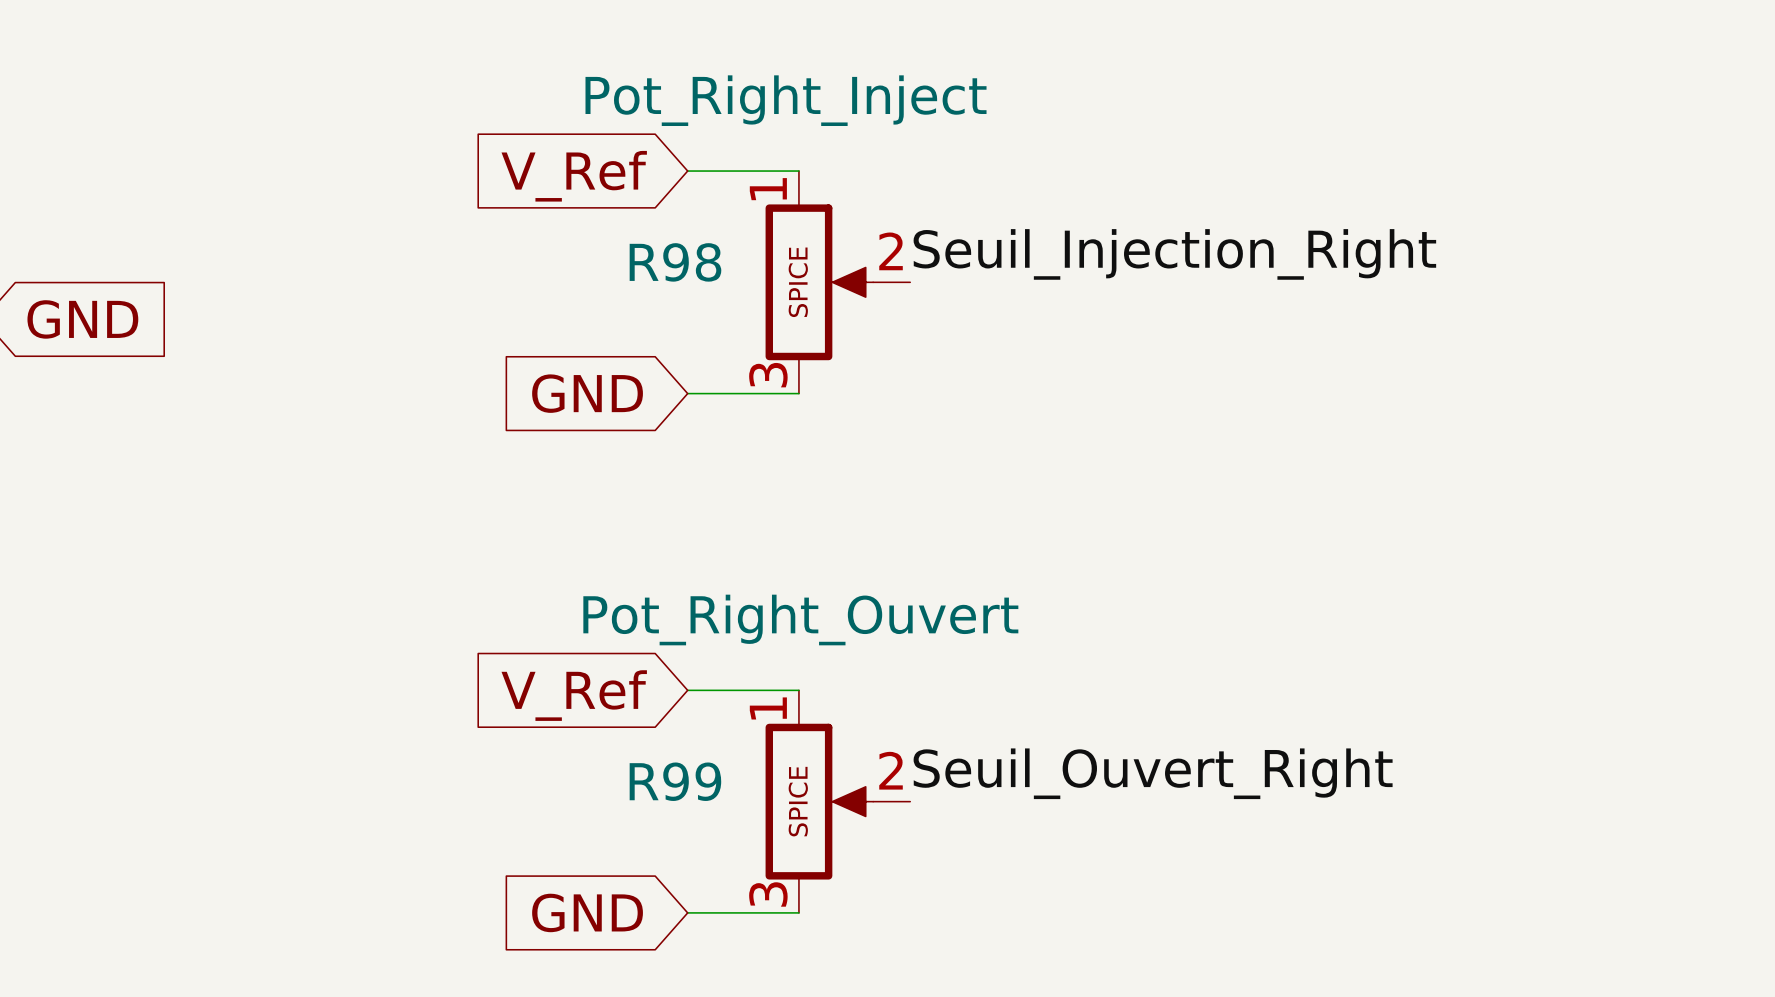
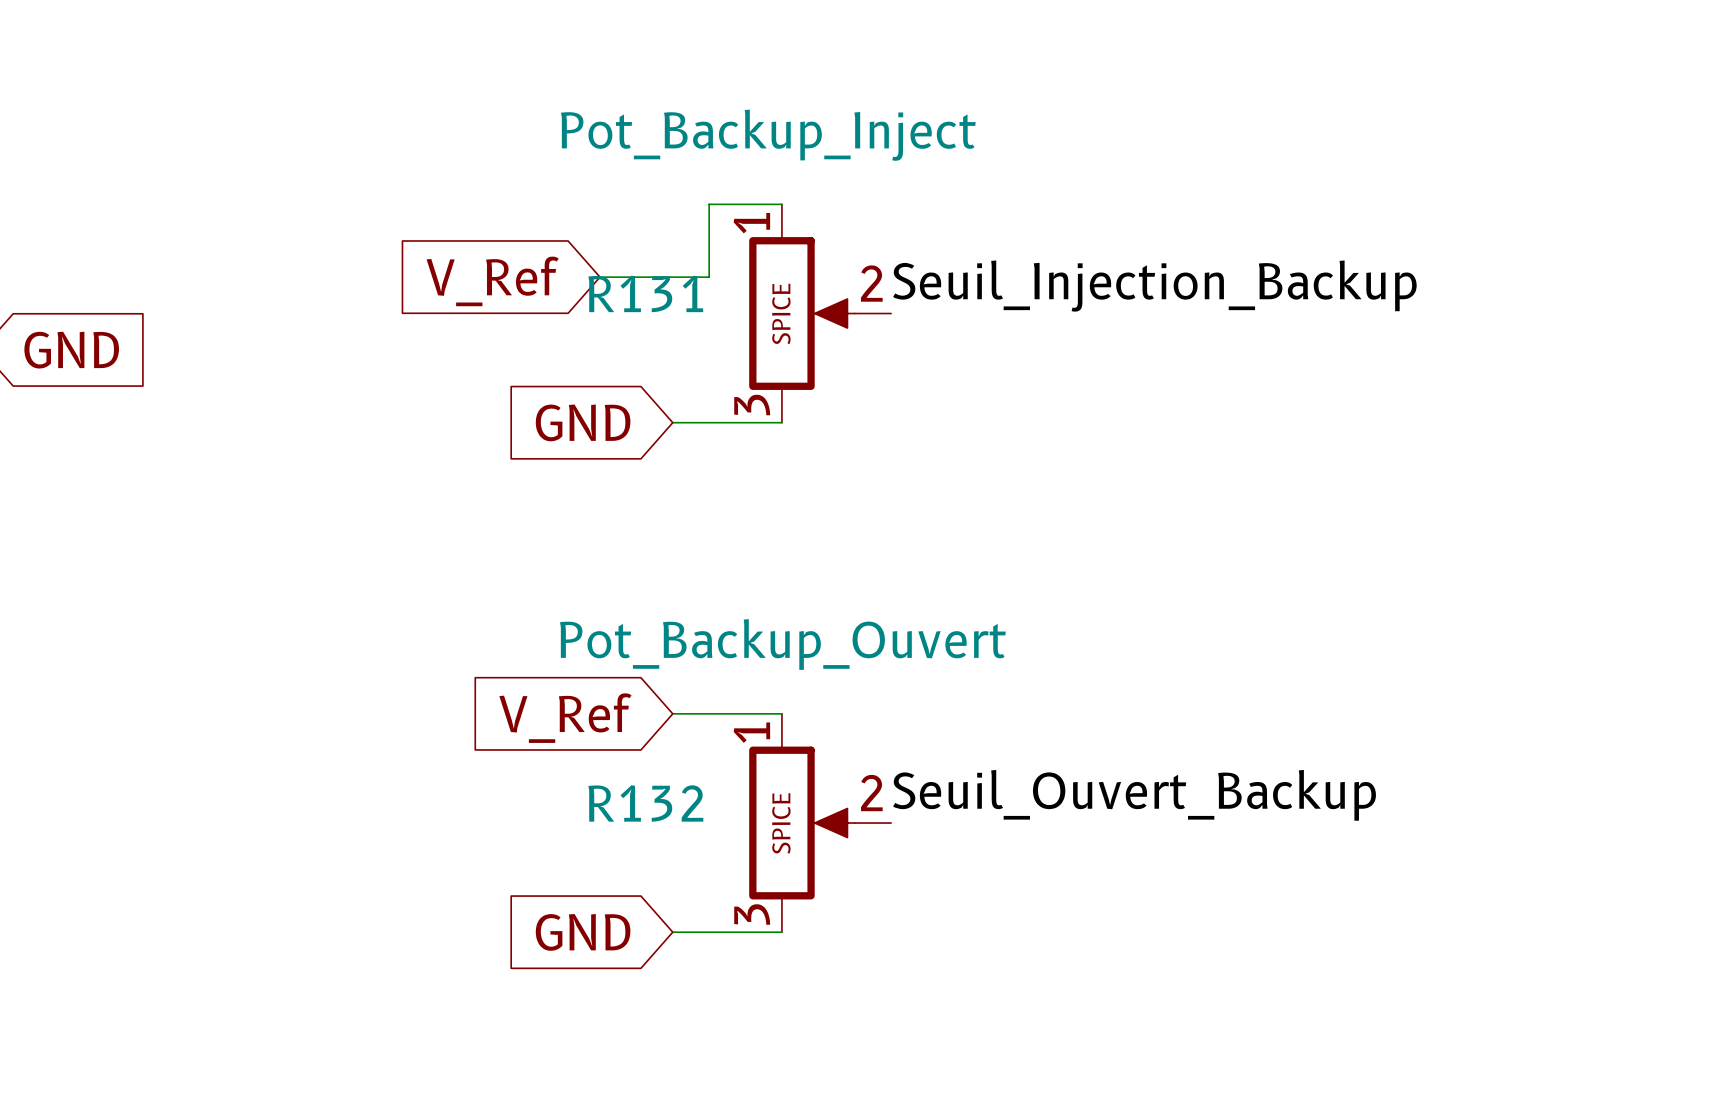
R98 text: Pot_Right_Inject (786, 100) -> Pot_Backup_Inject (768, 135)
wire: (687, 171) (724, 171) -> (599, 277) (709, 277) (709, 204)
global label position: V_Ref (574, 176) -> V_Ref (492, 281)
label: Seuil_Injection_Right (1174, 254) -> Seuil_Injection_Backup (1154, 286)
R98 name: R98 (675, 262) -> R131 (645, 293)
R99 text: Pot_Right_Ouvert (800, 619) -> Pot_Backup_Ouvert (782, 644)
label: Seuil_Ouvert_Right (1153, 773) -> Seuil_Ouvert_Backup (1134, 795)
R99 name: R99 (675, 781) -> R132 (645, 803)

